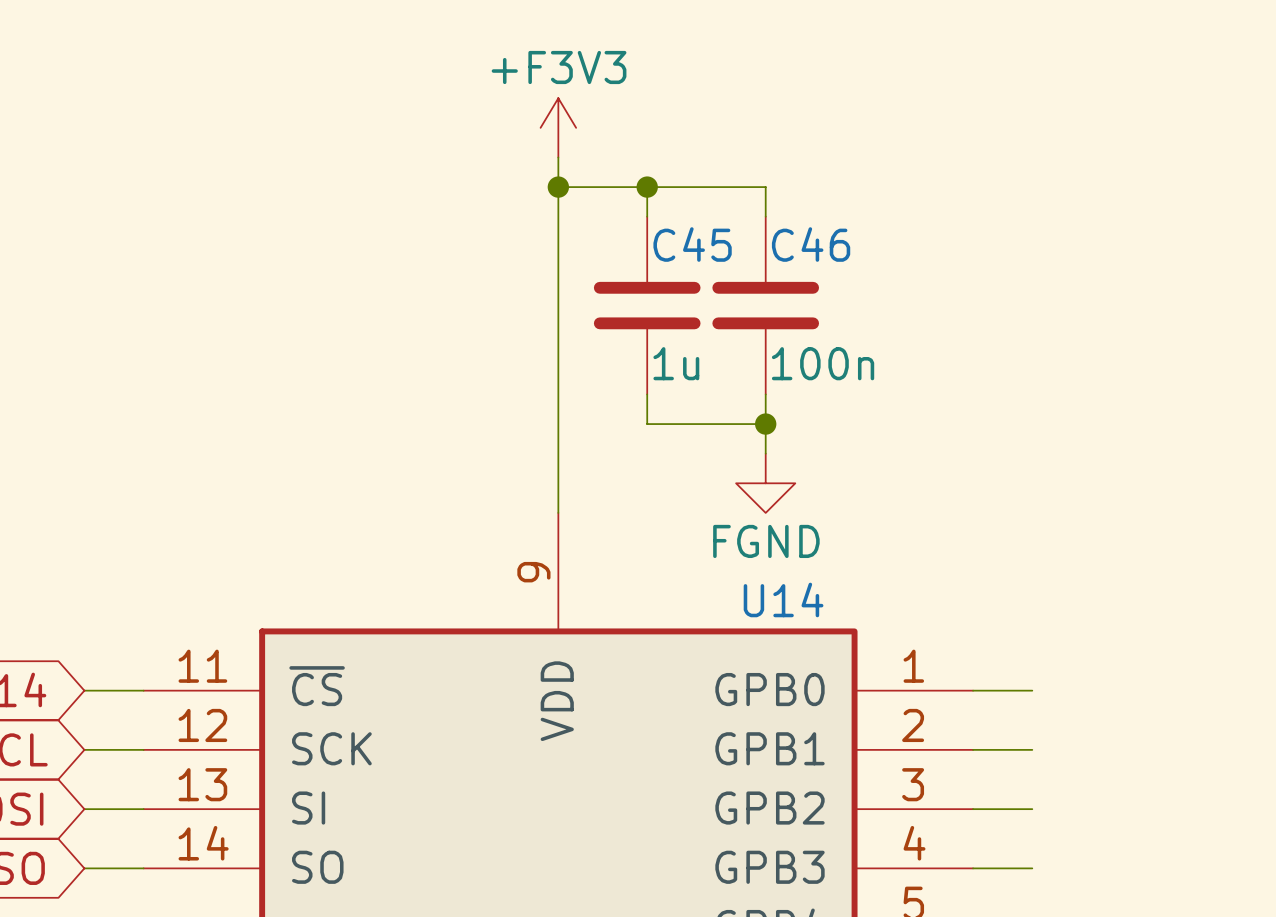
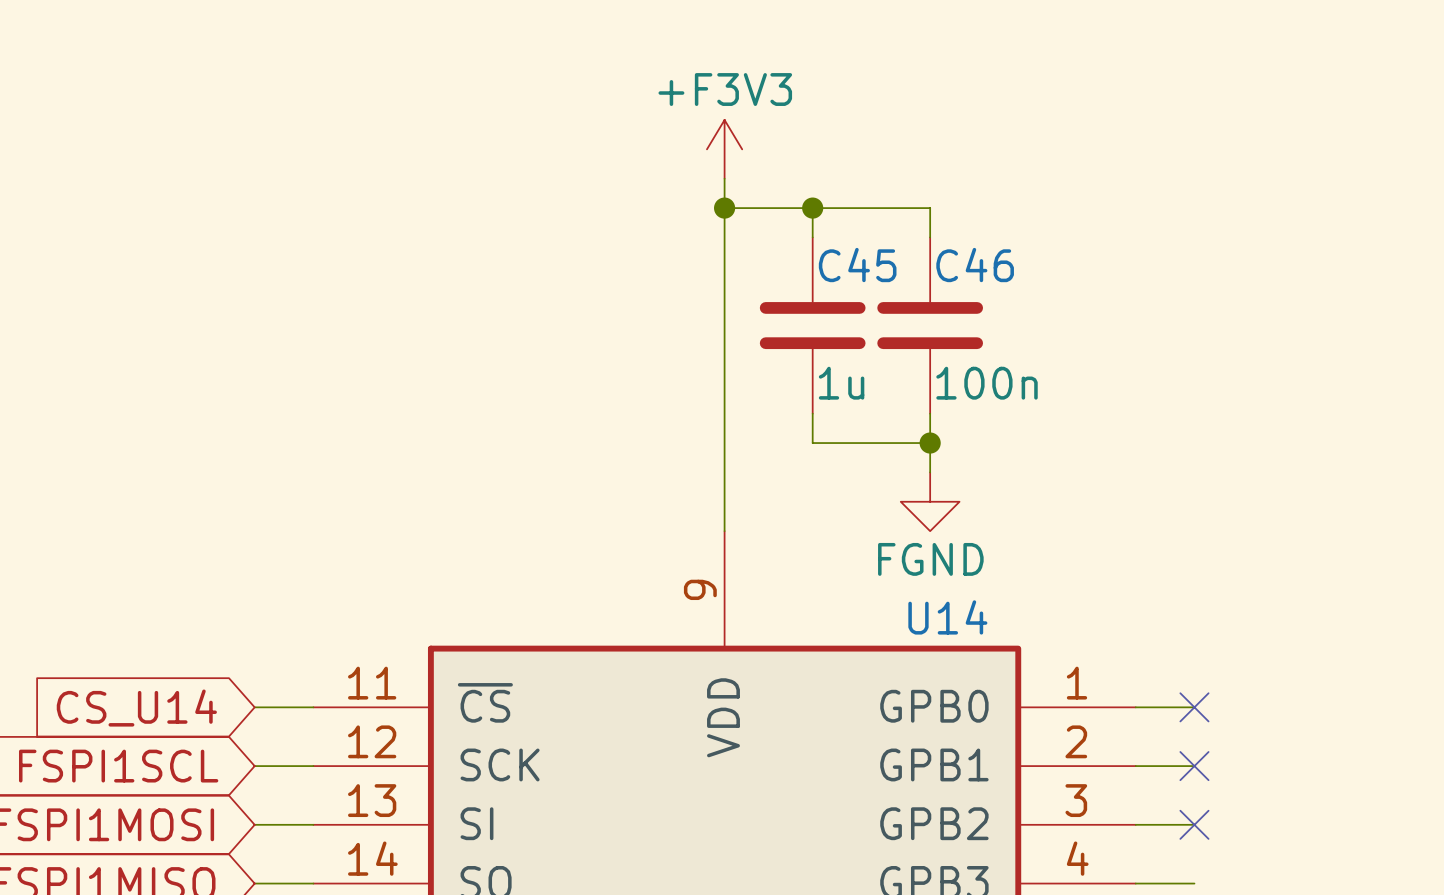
no-connect mark: none -> (1194, 707)
no-connect mark: none -> (1194, 766)
no-connect mark: none -> (1194, 824)

